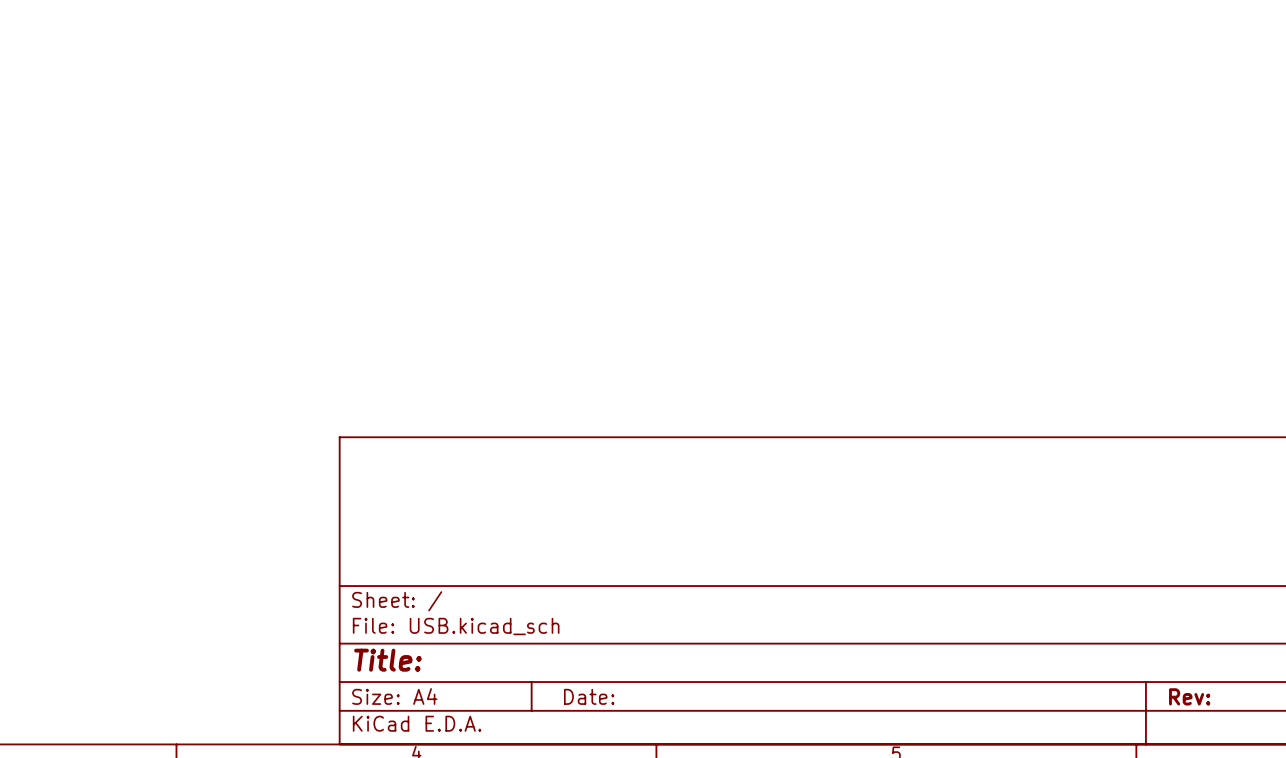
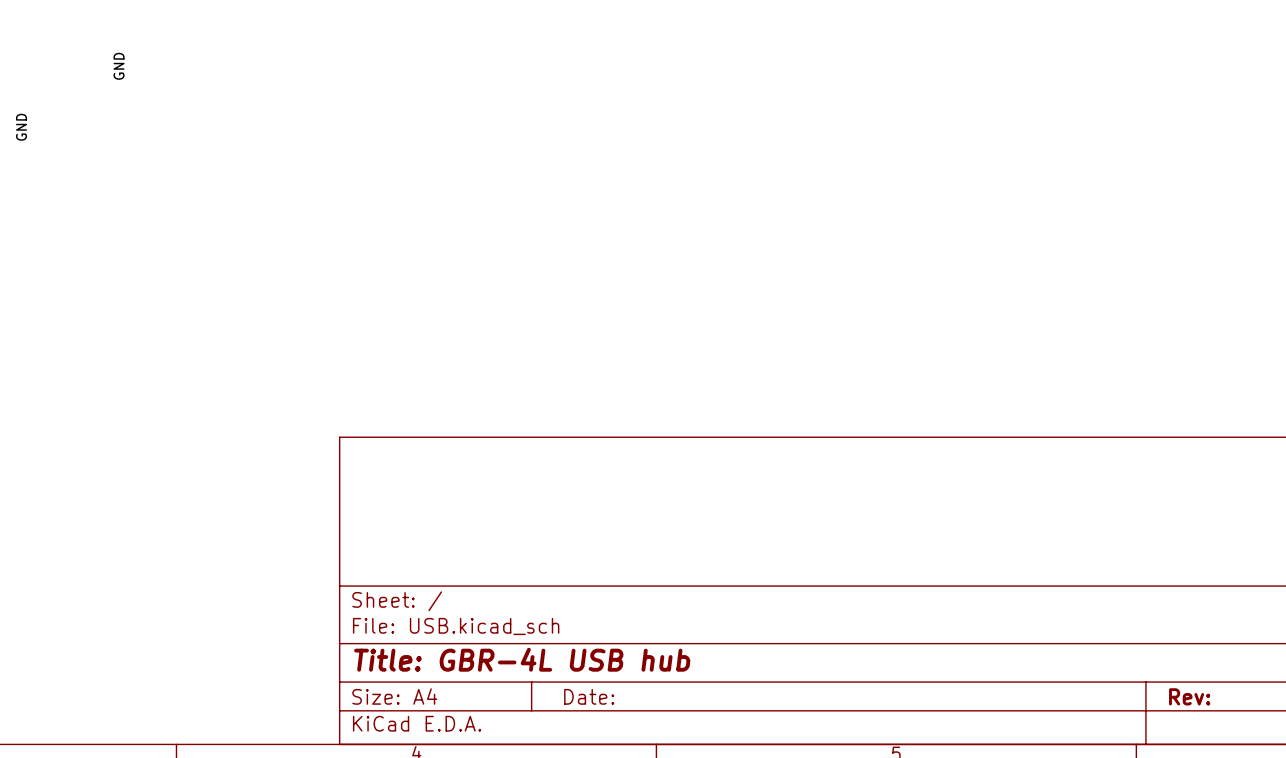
label: none -> GND (119, 66)
label: none -> GND (21, 127)
title block: Title: (387, 660) -> Title: GBR-4L USB hub (522, 659)

